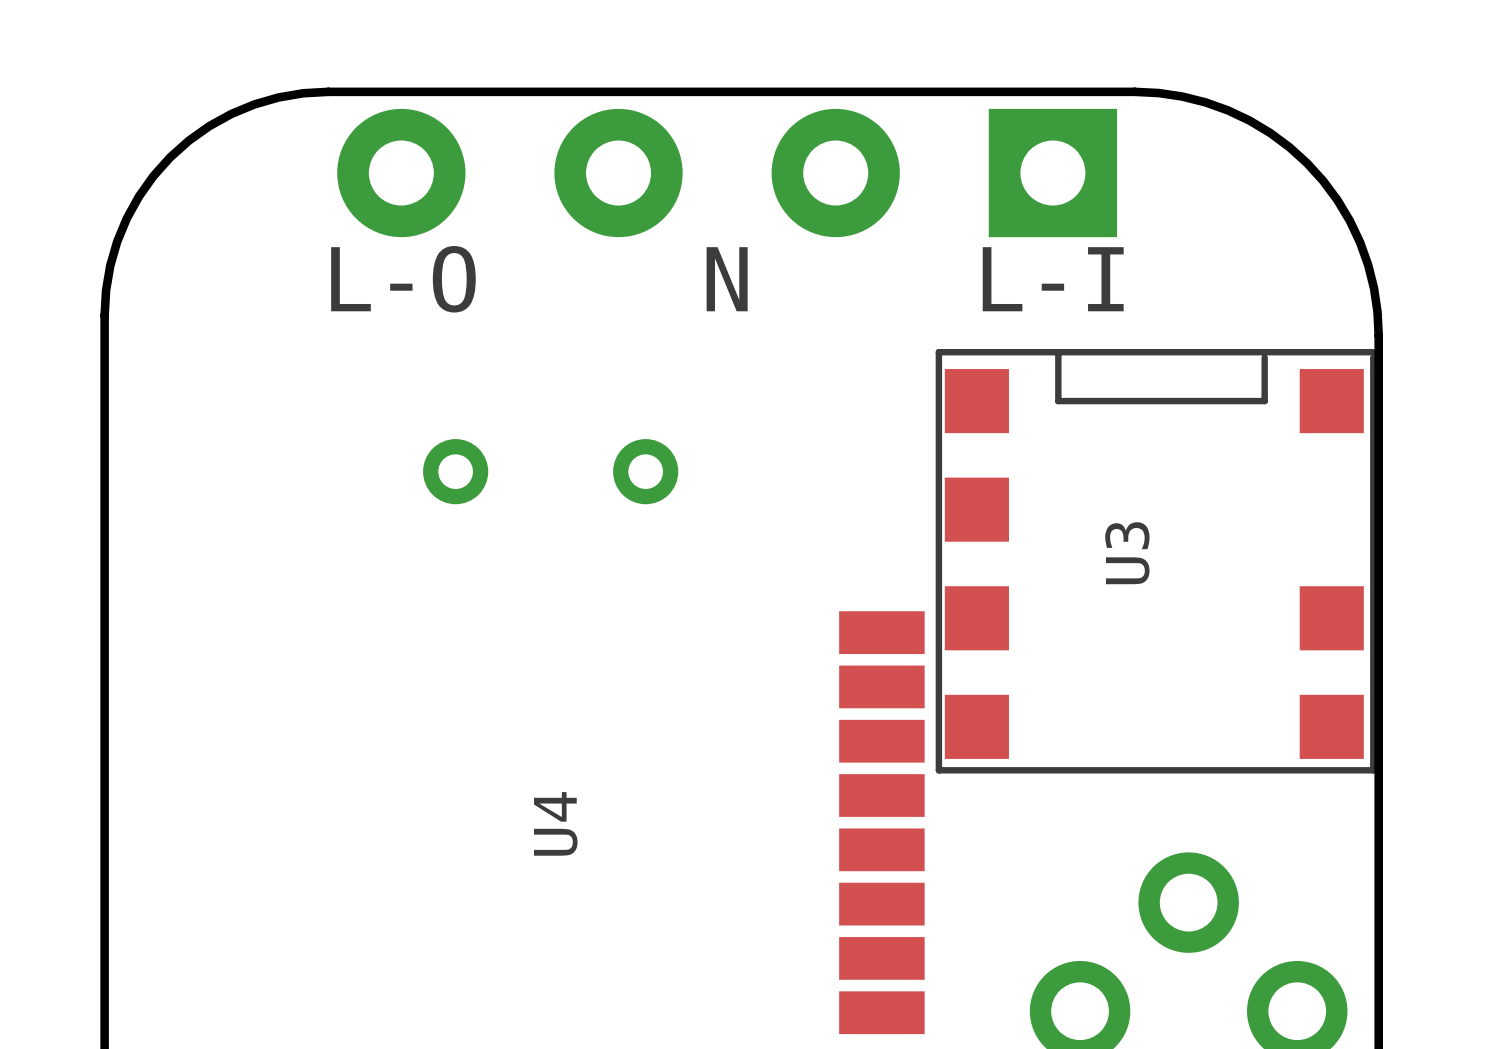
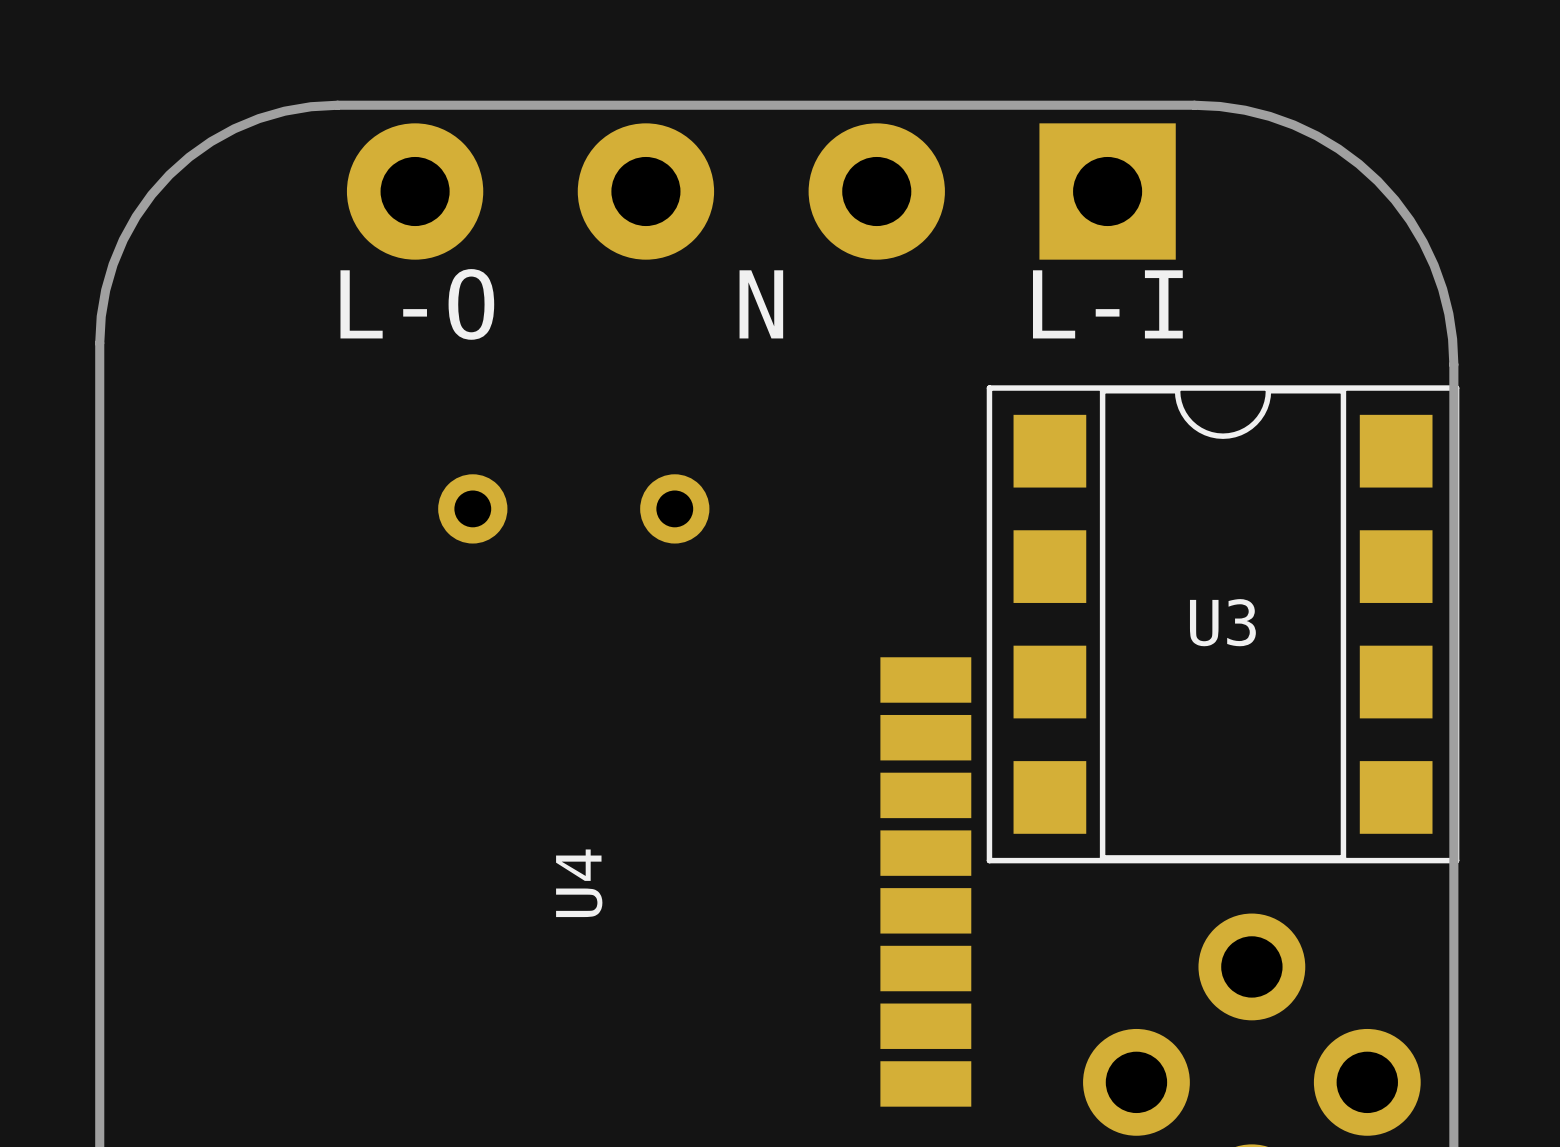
U3 footprint: [935, 349, 1377, 774] -> [986, 385, 1460, 864]

